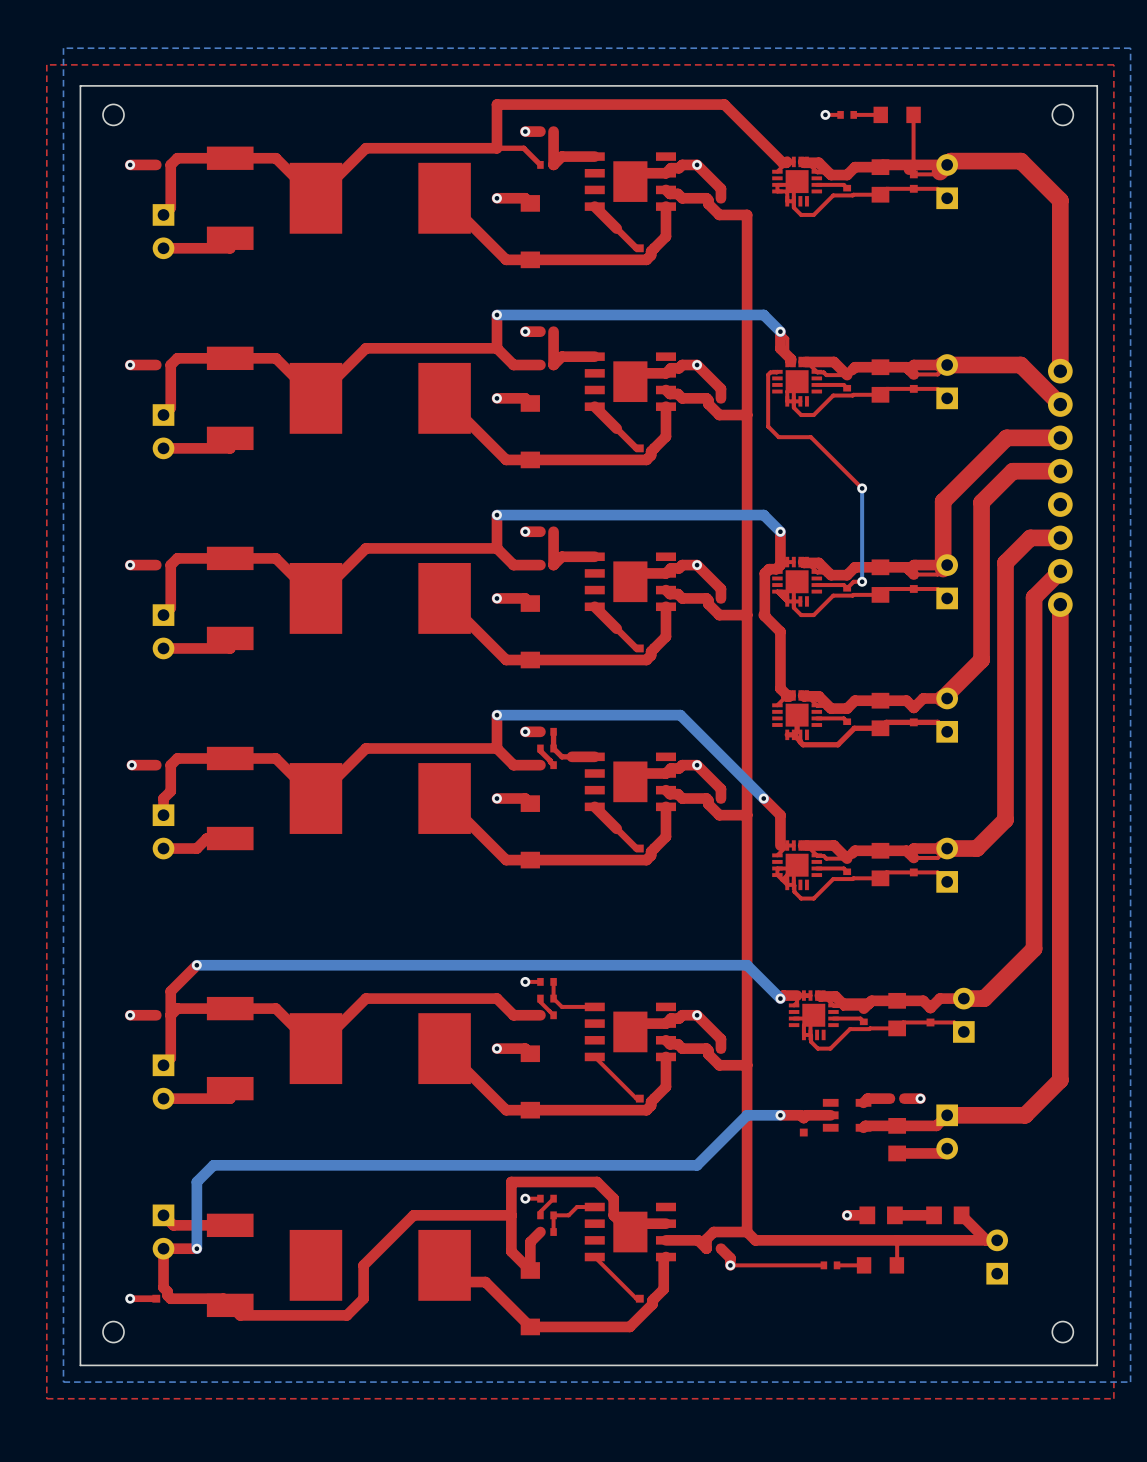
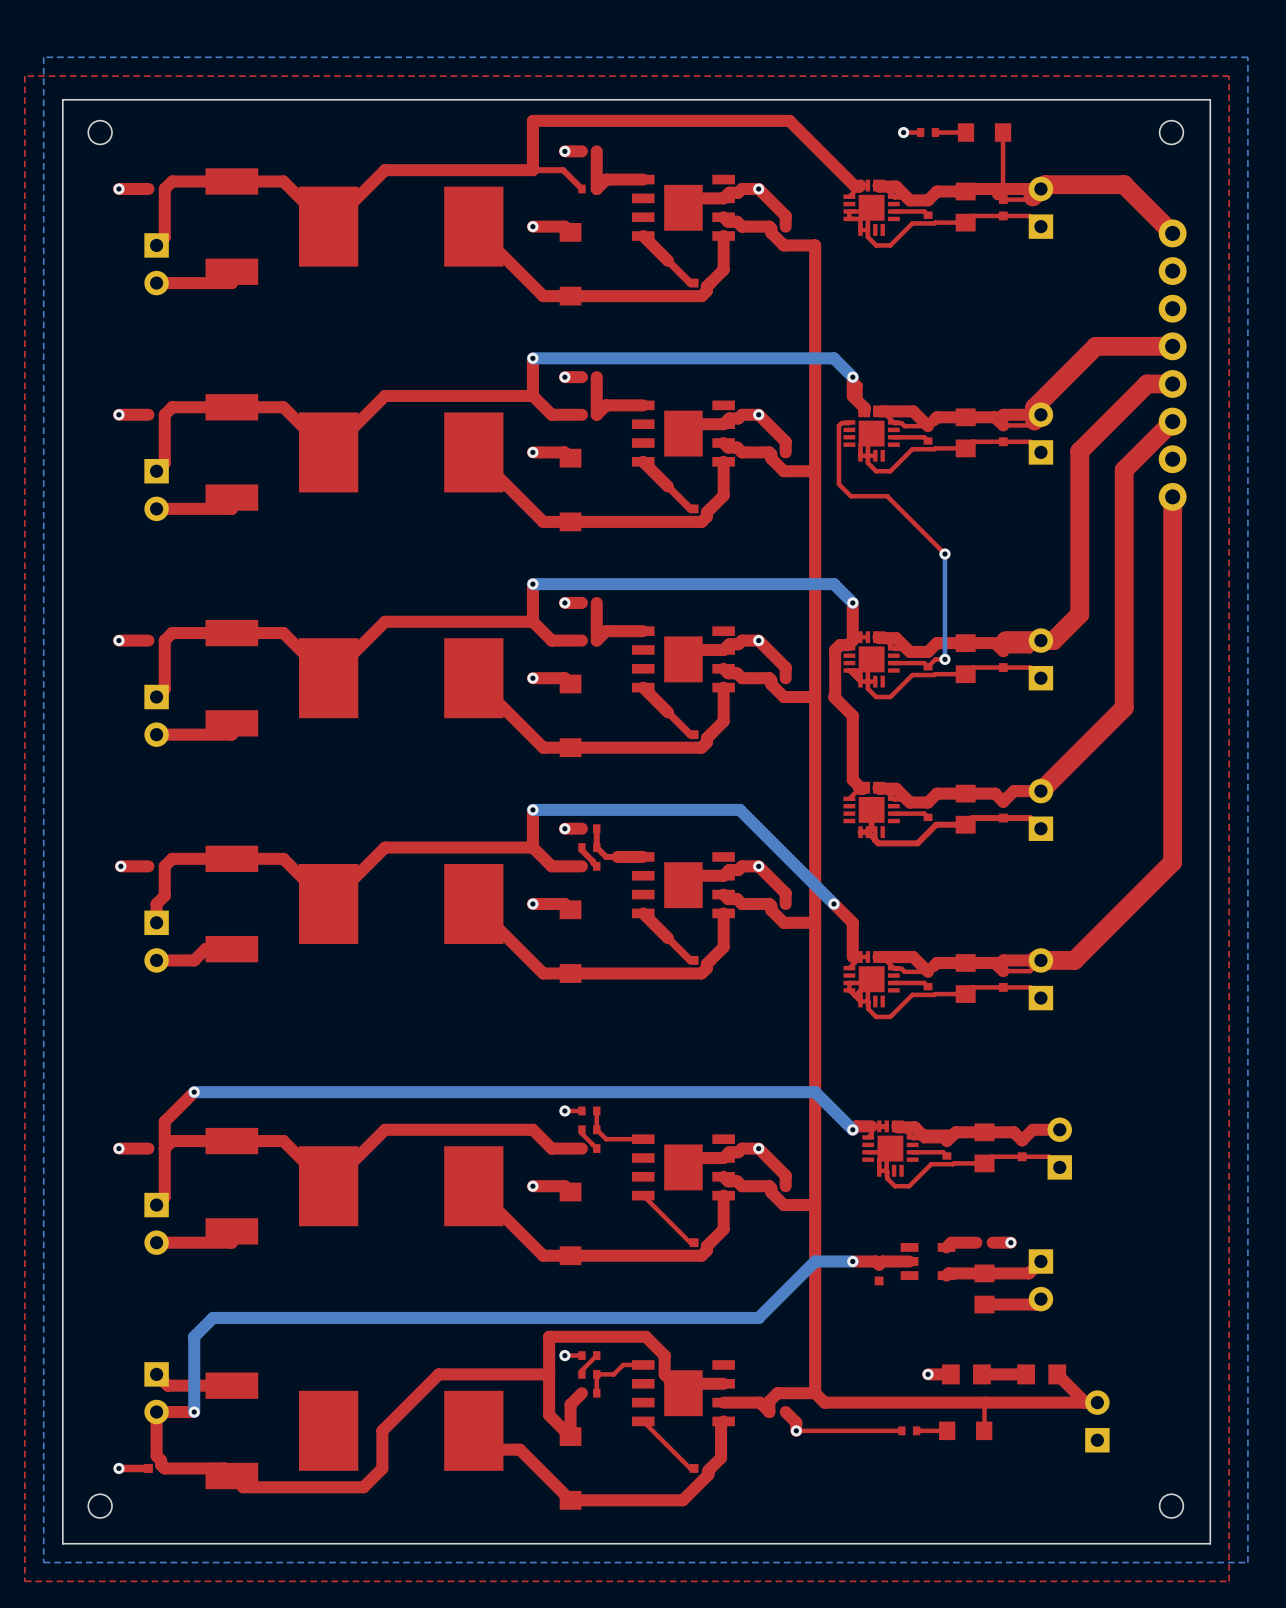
top track: (1020, 161) (1060, 200) (1060, 371) -> (1124, 184) (1172, 233)
top track: none -> (1172, 346) (1095, 346) (1034, 407) (1034, 421)
top track: (942, 365) (1020, 365) (1060, 404) -> none
top track: none -> (1172, 421) (1124, 470) (1124, 707) (1040, 791)
top track: (1060, 437) (1006, 437) (943, 501) (943, 569) -> none
top track: (1060, 471) (1012, 471) (981, 502) -> (1172, 383) (1147, 383) (1079, 451) (1079, 569)
part position: (1060, 487) -> (1172, 365)
top track: (1060, 537) (1030, 537) (1005, 562) (1005, 819) -> (1172, 496) (1172, 862) (1106, 928)
top track: (981, 541) (981, 660) (942, 698) -> (1079, 614) (1053, 640) (1005, 640)
top track: (1060, 571) (1034, 597) (1034, 948) (984, 998) (963, 998) -> none
top track: (1060, 604) (1060, 1080) (1025, 1115) (947, 1115) -> none

